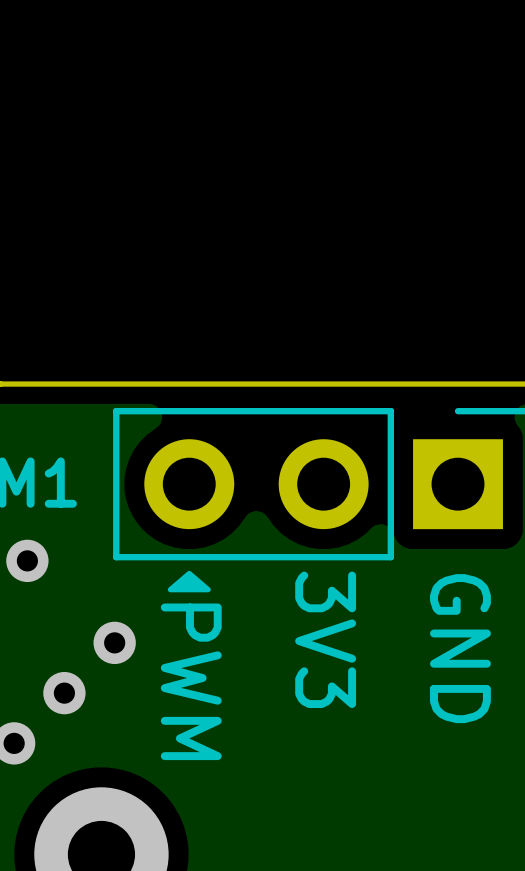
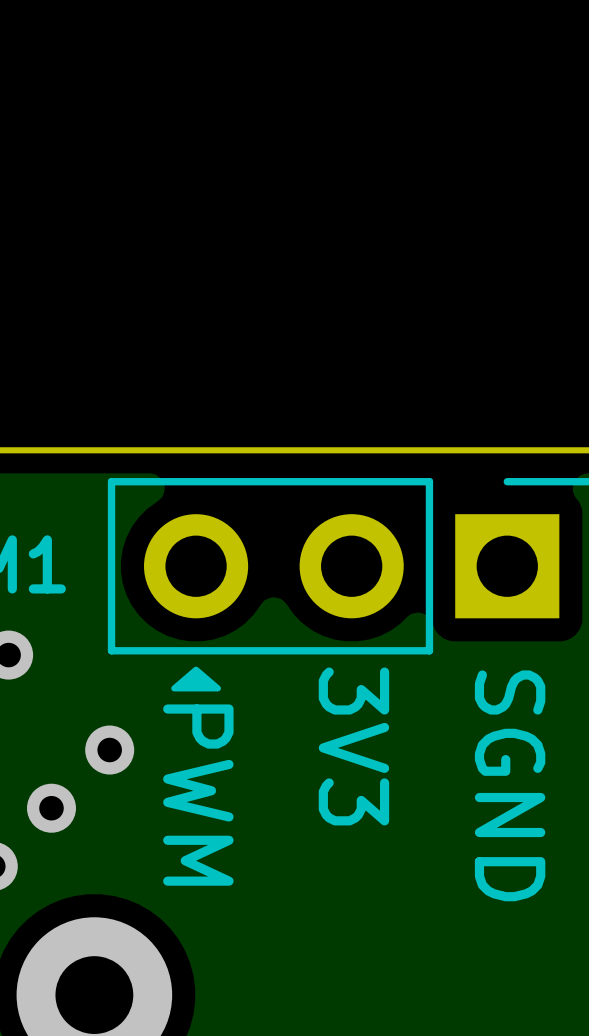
text: GND (460, 648) -> SGND (510, 785)

